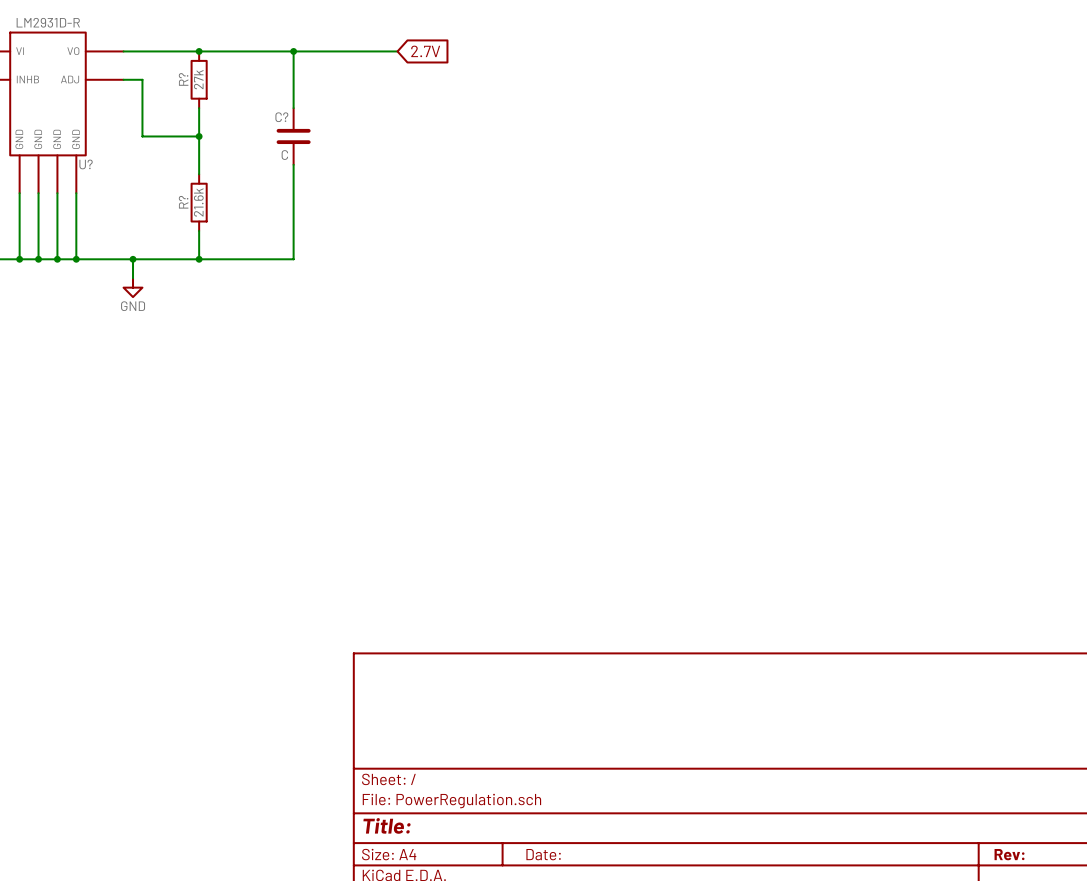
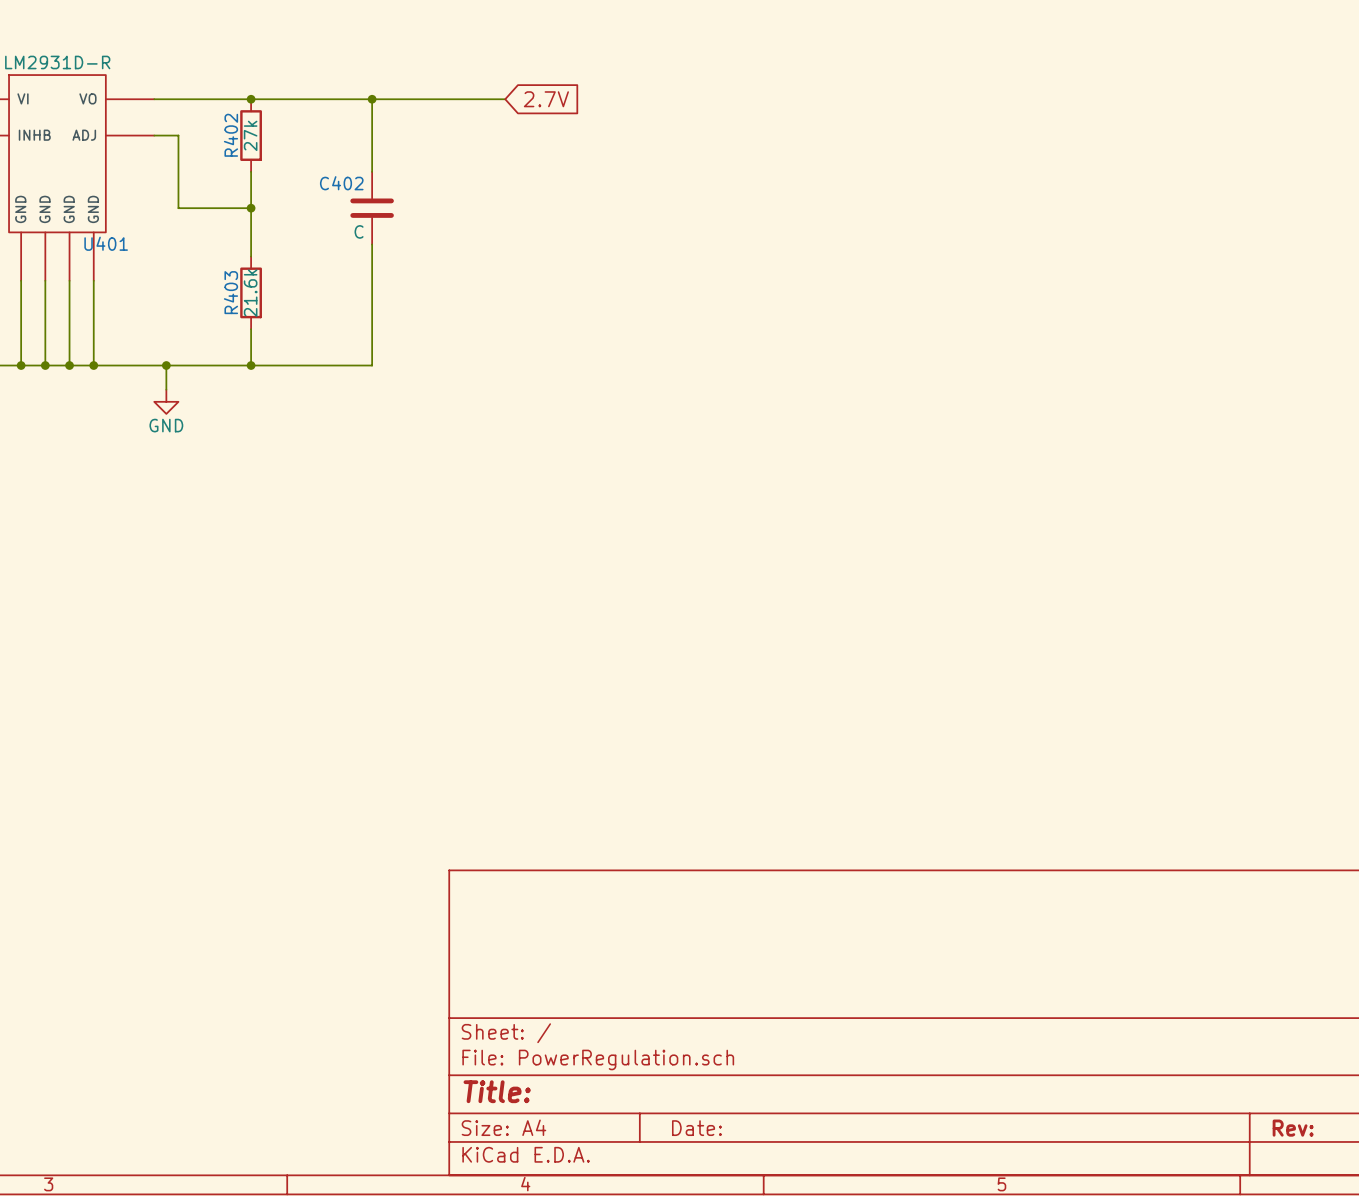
R? name: R? (183, 79) -> R402 (230, 135)
C? name: C? (281, 117) -> C402 (341, 183)
U? name: U? (86, 164) -> U401 (106, 243)
R? name: R? (183, 202) -> R403 (230, 292)

